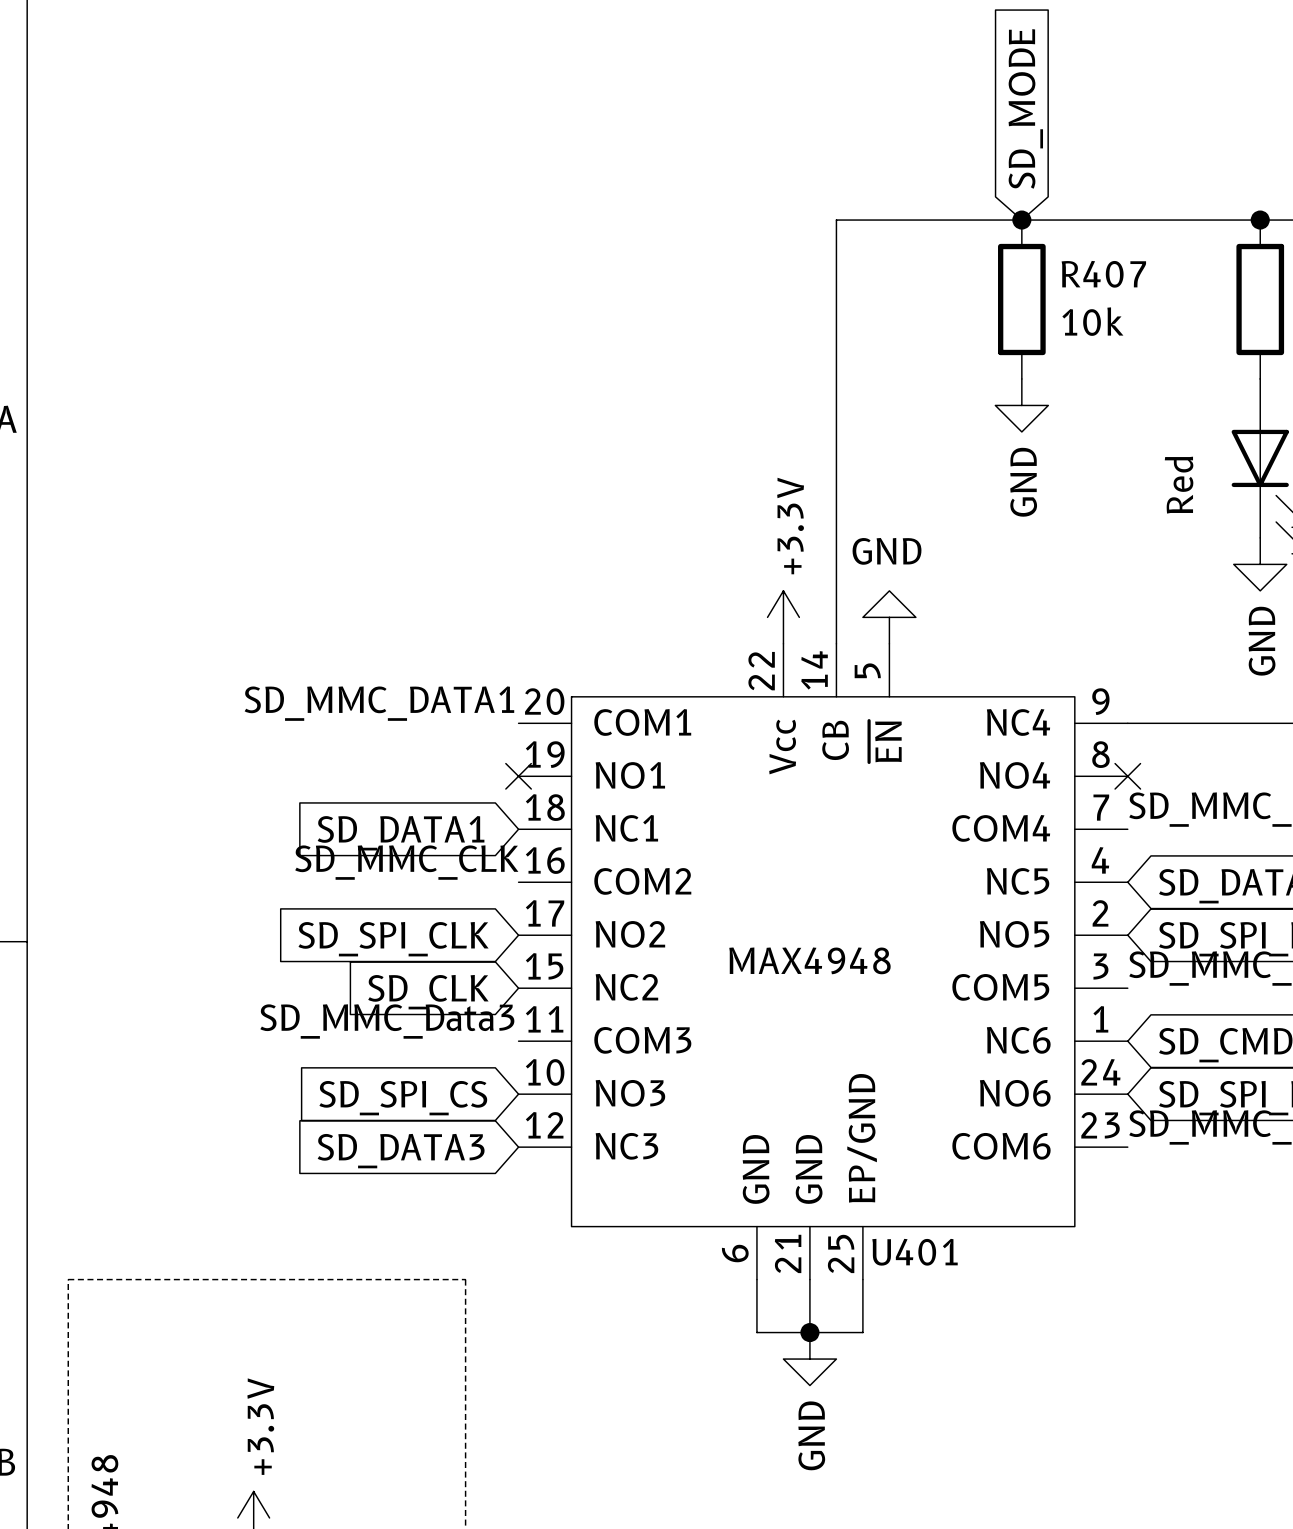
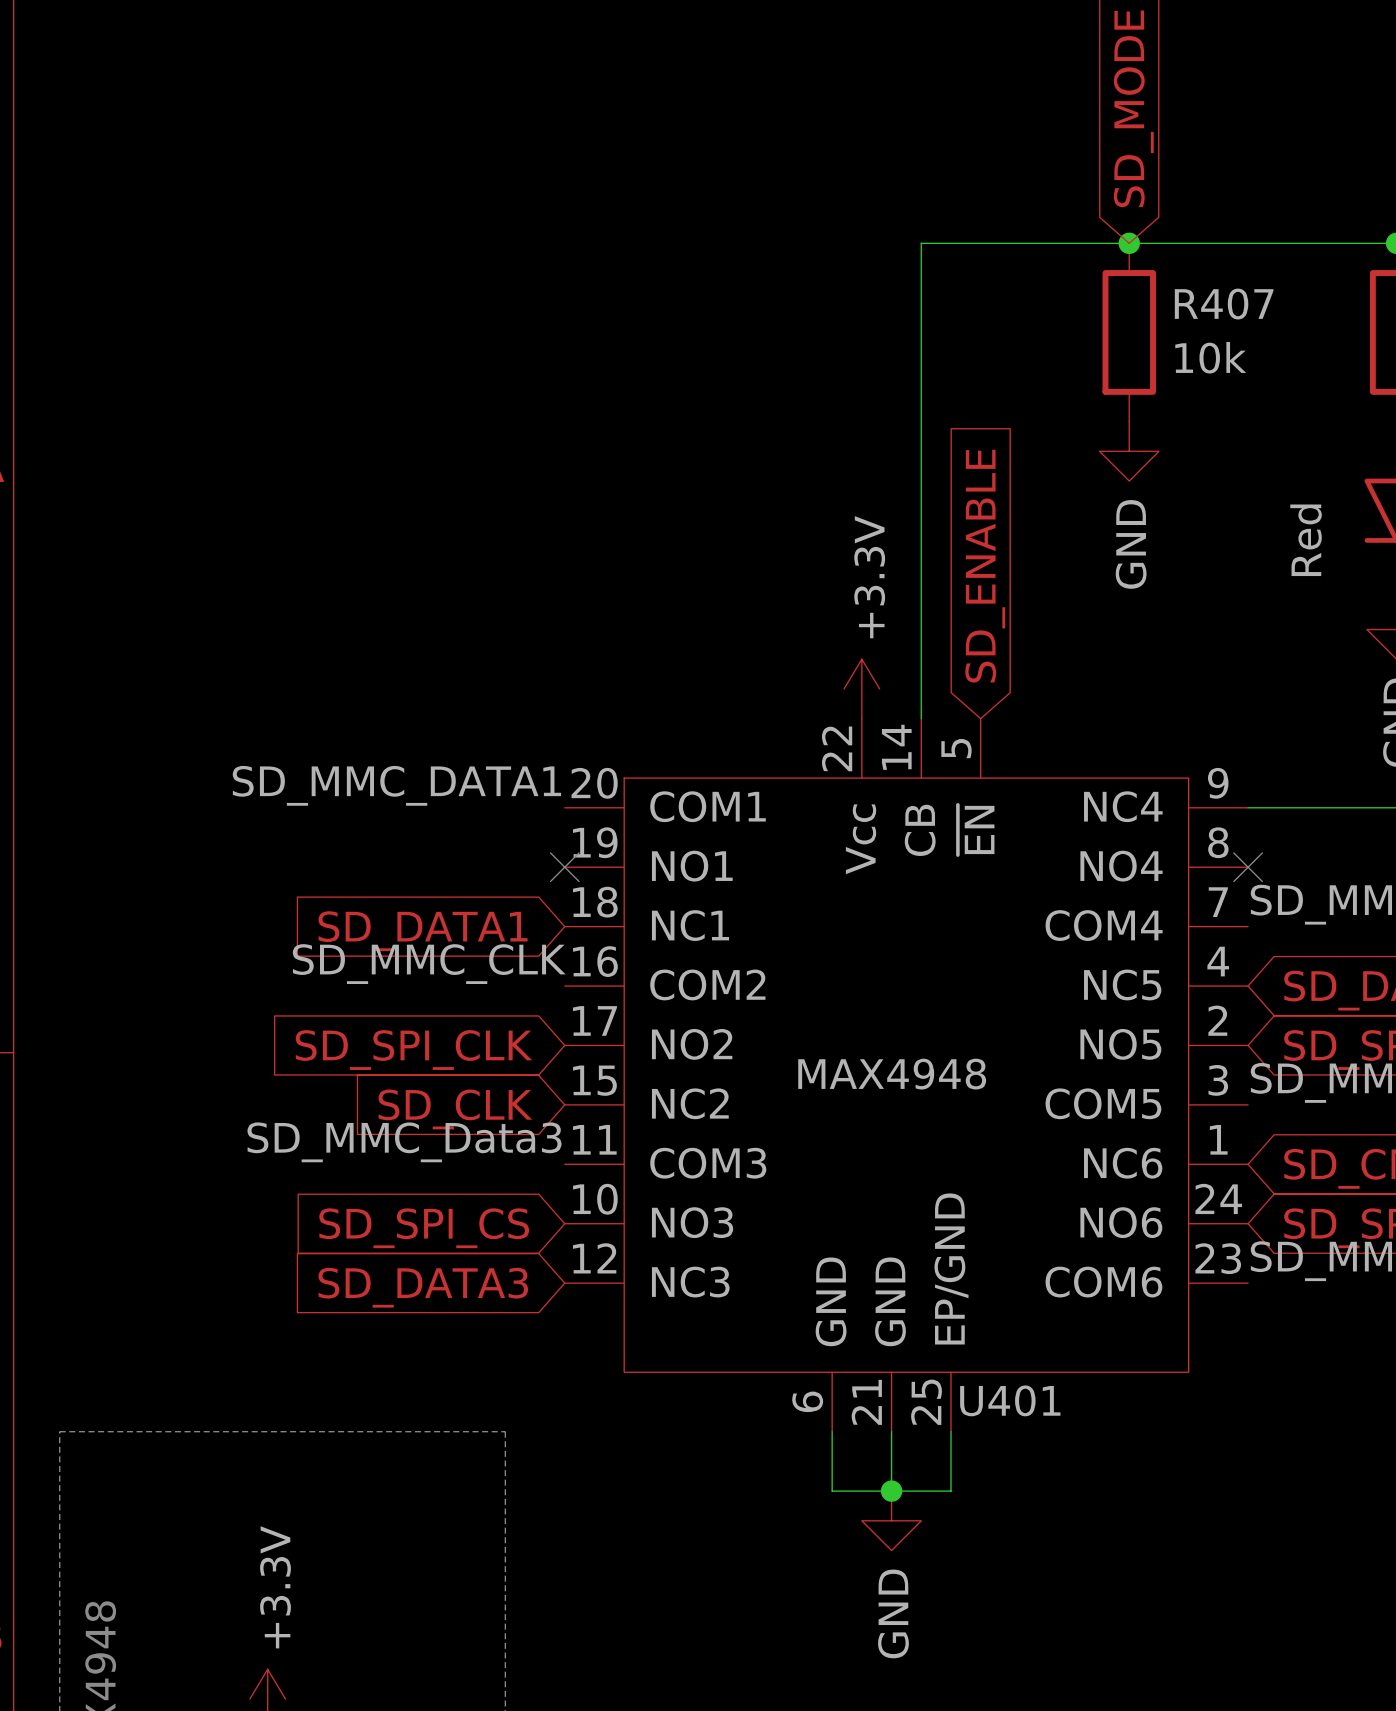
global label: none -> SD_ENABLE (985, 566)
power symbol: GND (889, 617) -> none

